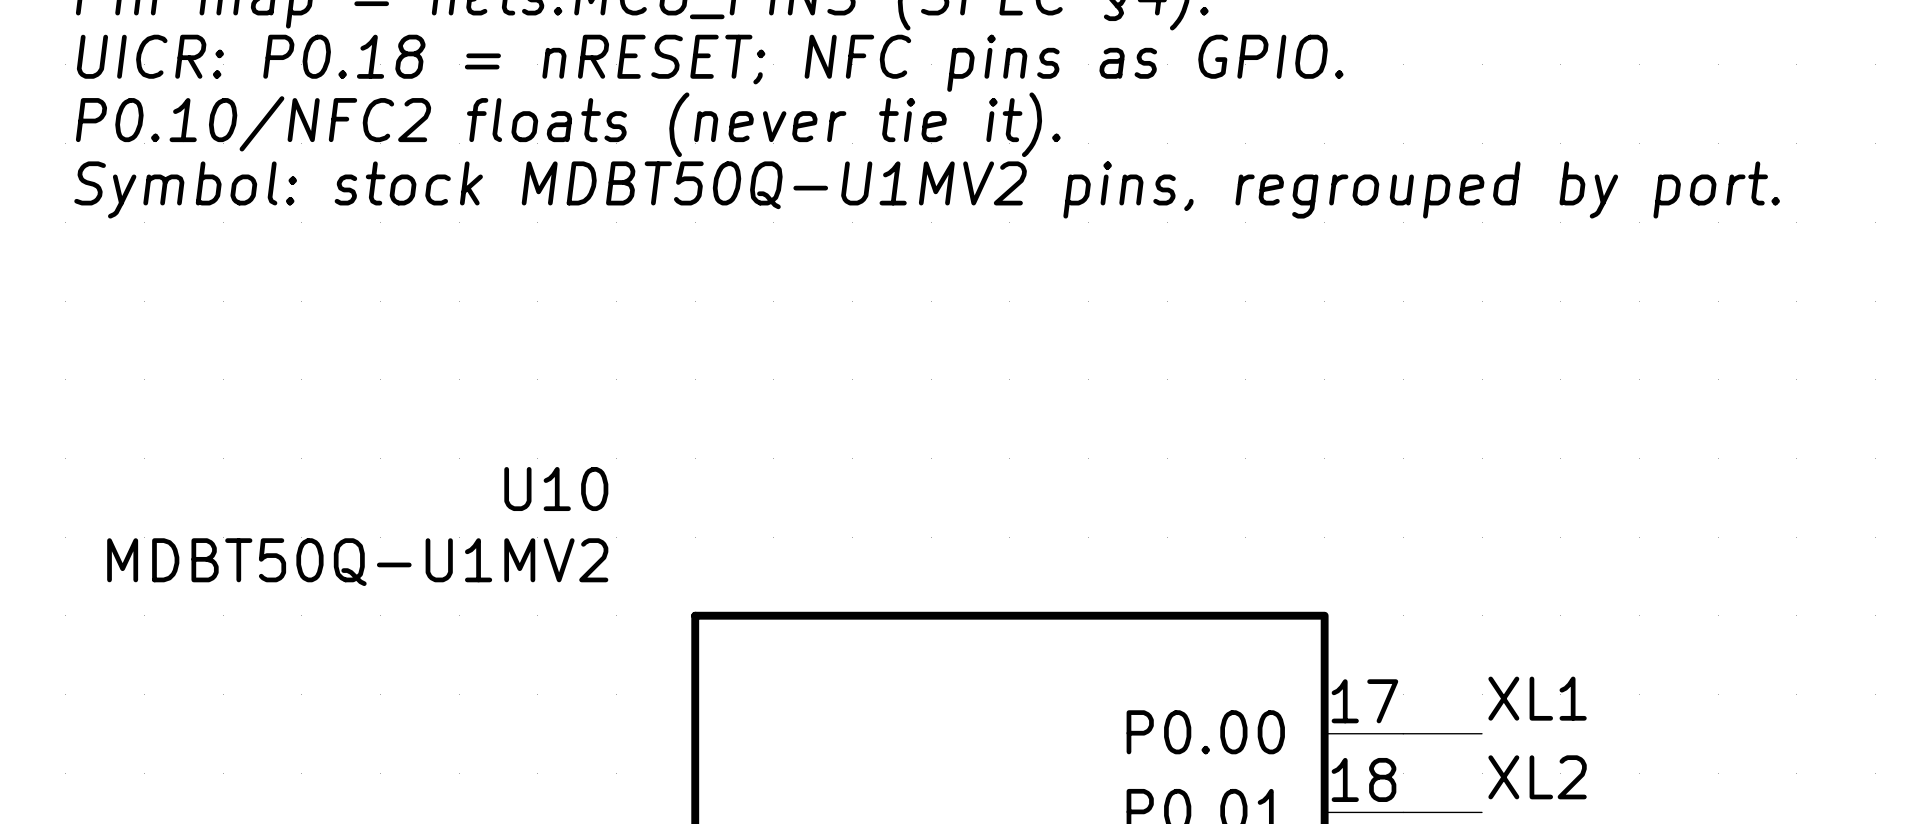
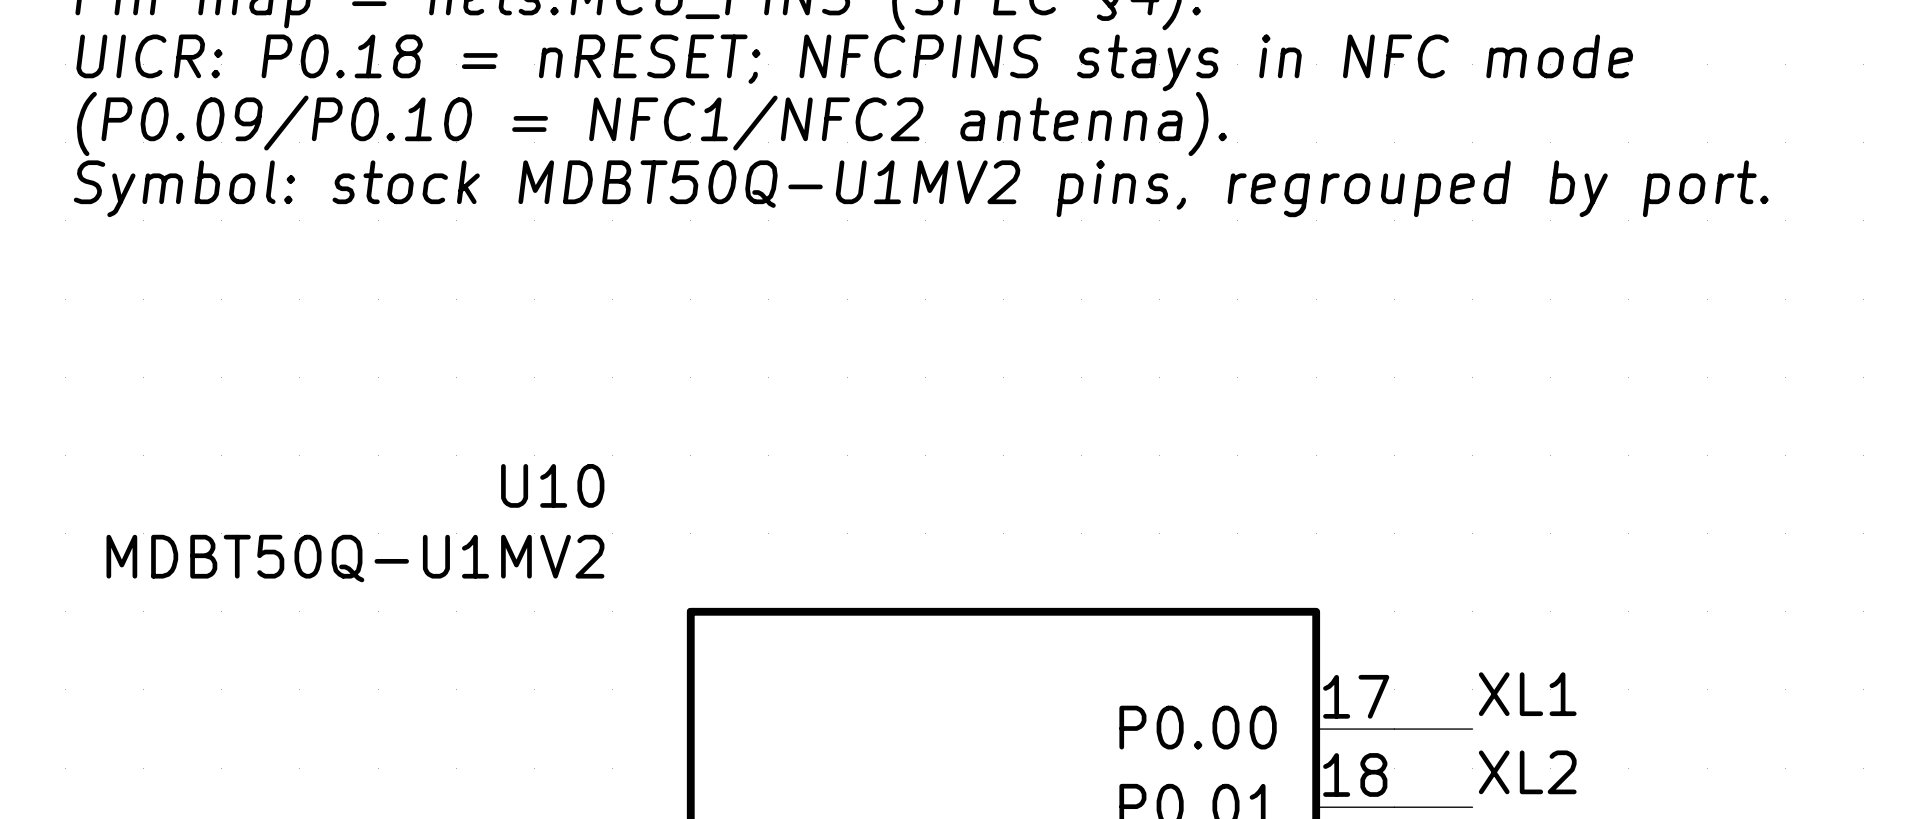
text: UICR: P0.18 = nRESET; NFC pins as GPIO. (710, 63) -> UICR: P0.18 = nRESET; NFCPINS stays in NFC mode (854, 62)
text: P0.10/NFC2 floats (never tie it). (568, 124) -> (P0.09/P0.10 = NFC1/NFC2 antenna). (651, 123)

